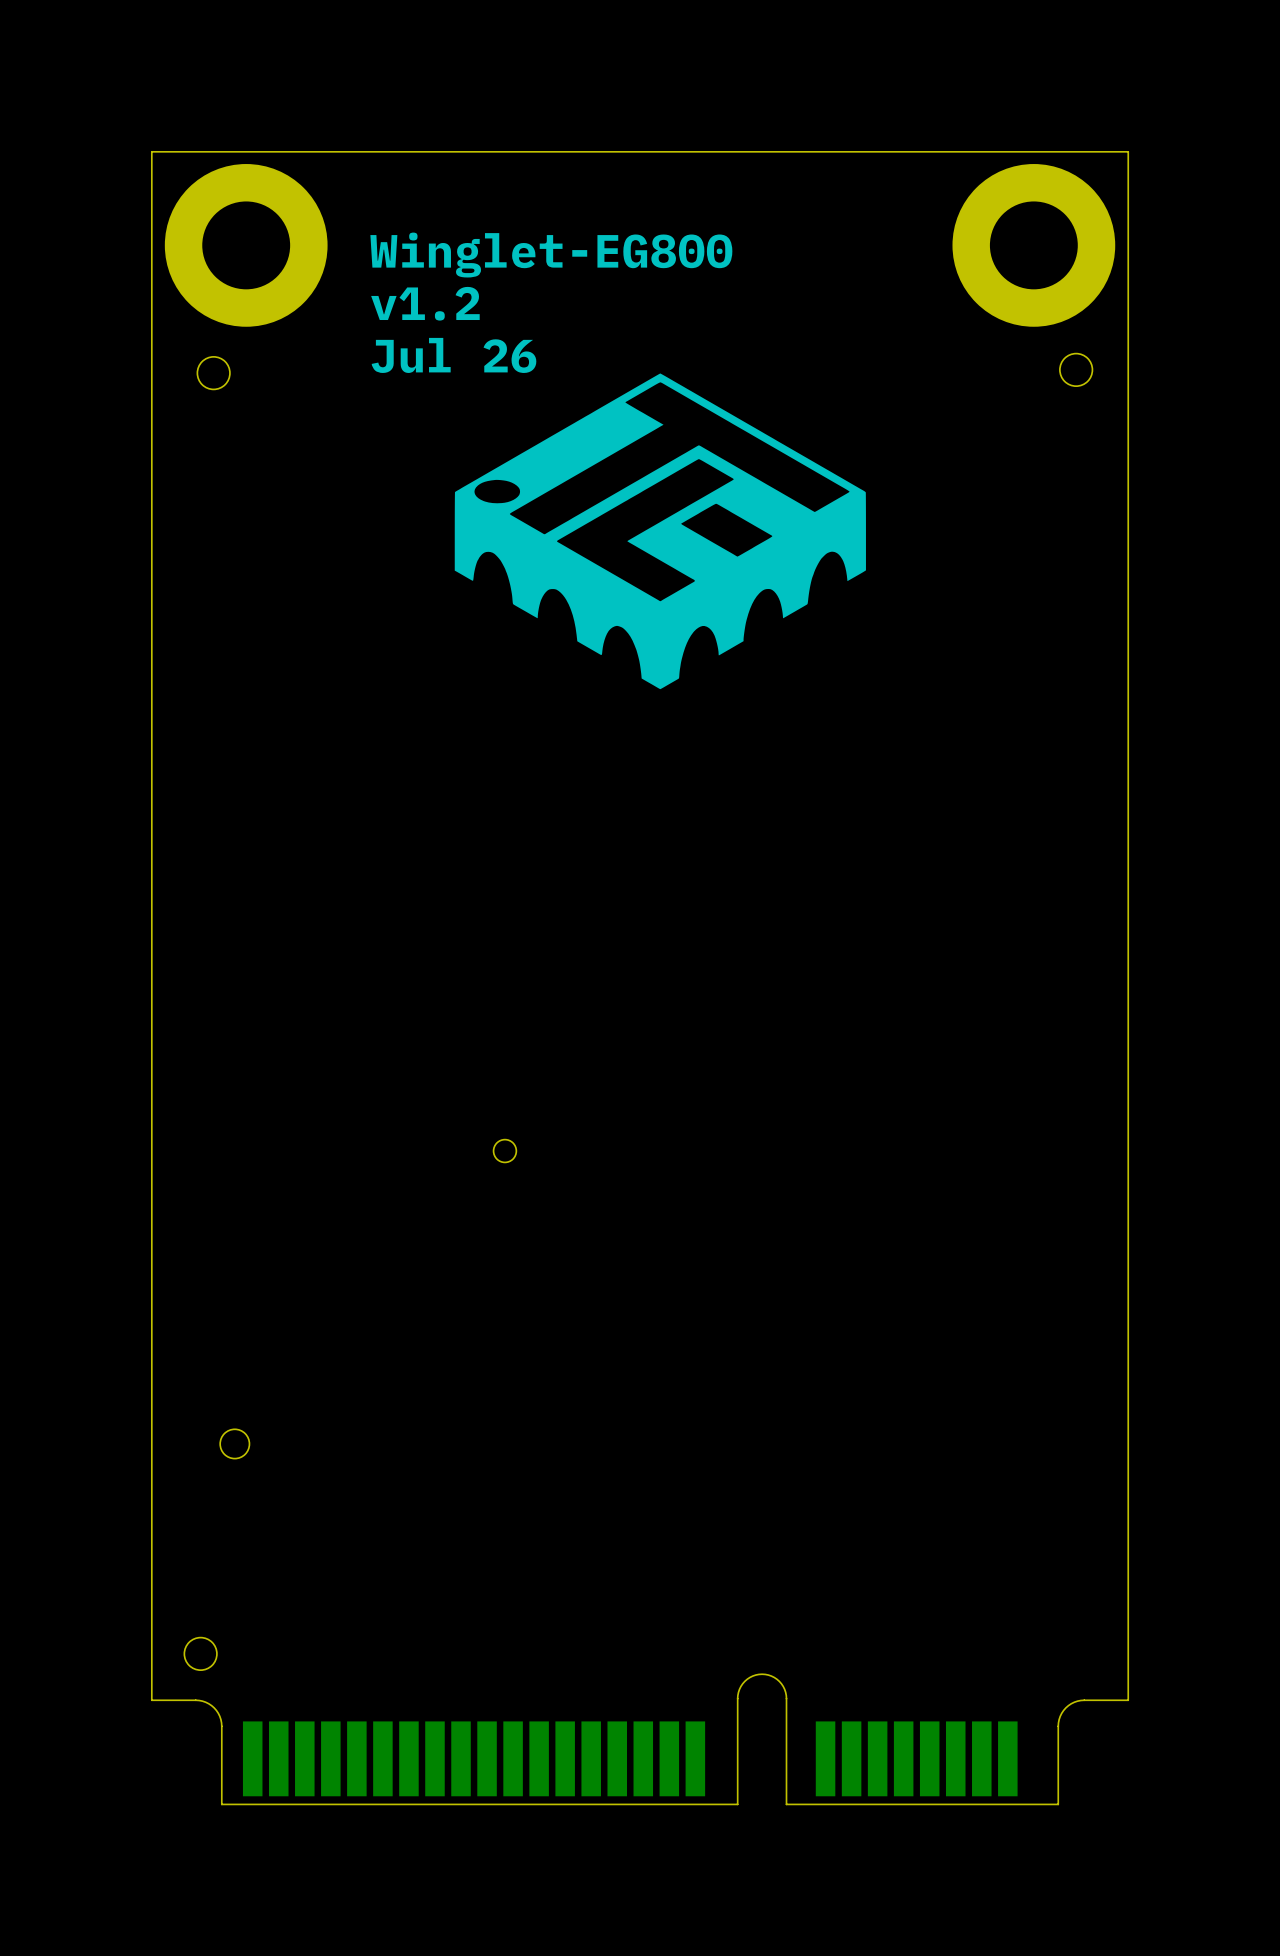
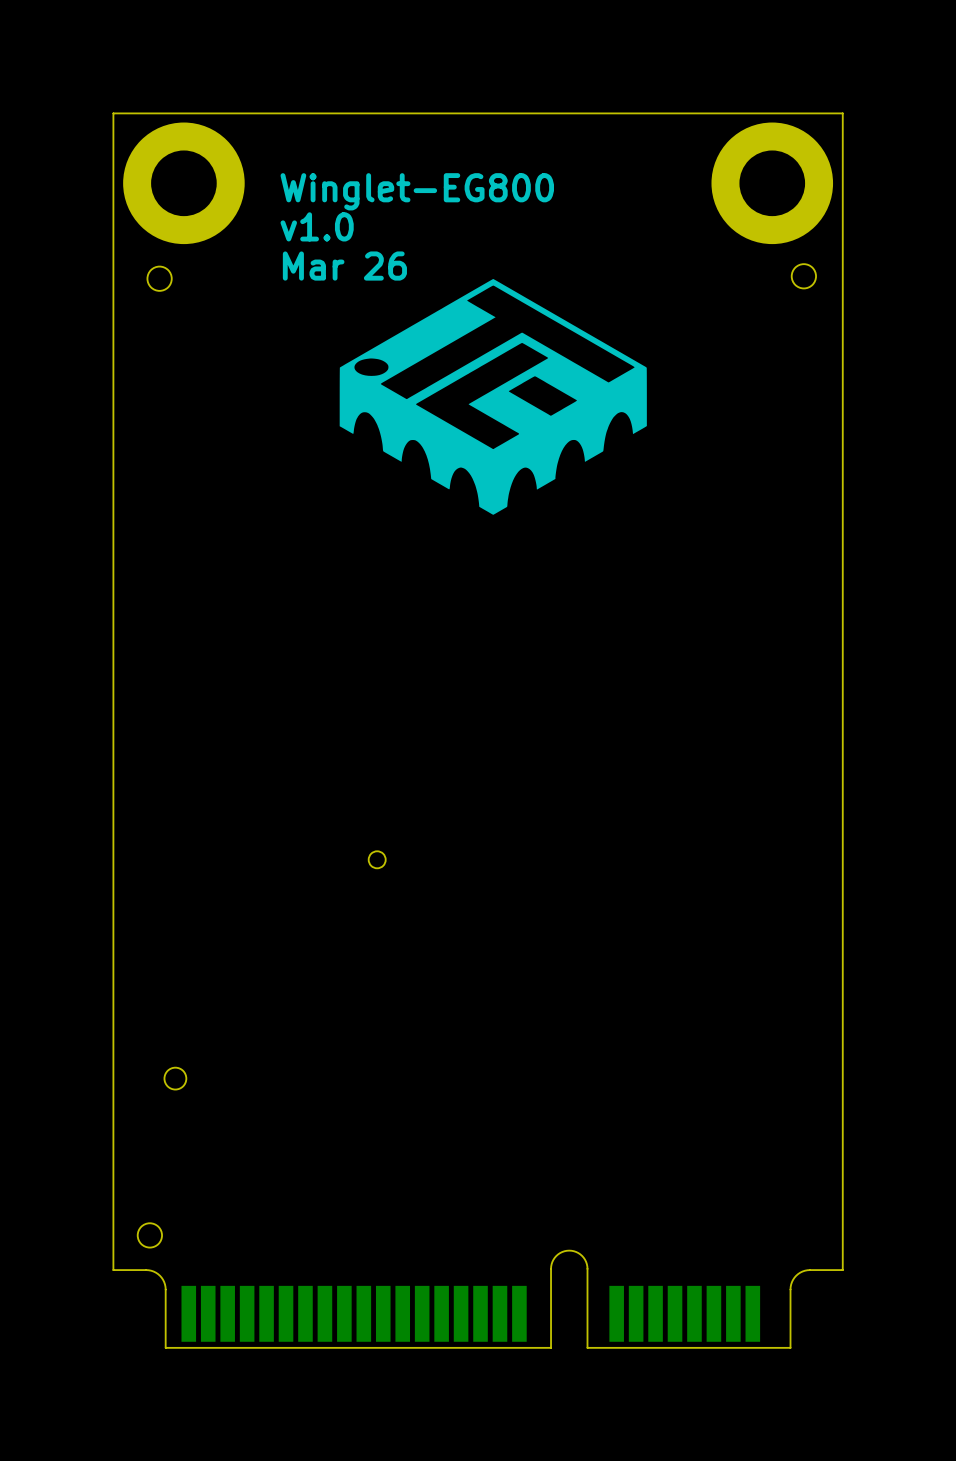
text: v1.2 (425, 303) -> v1.0 (317, 226)
text: Jul 26 (453, 355) -> Mar 26 (344, 266)

